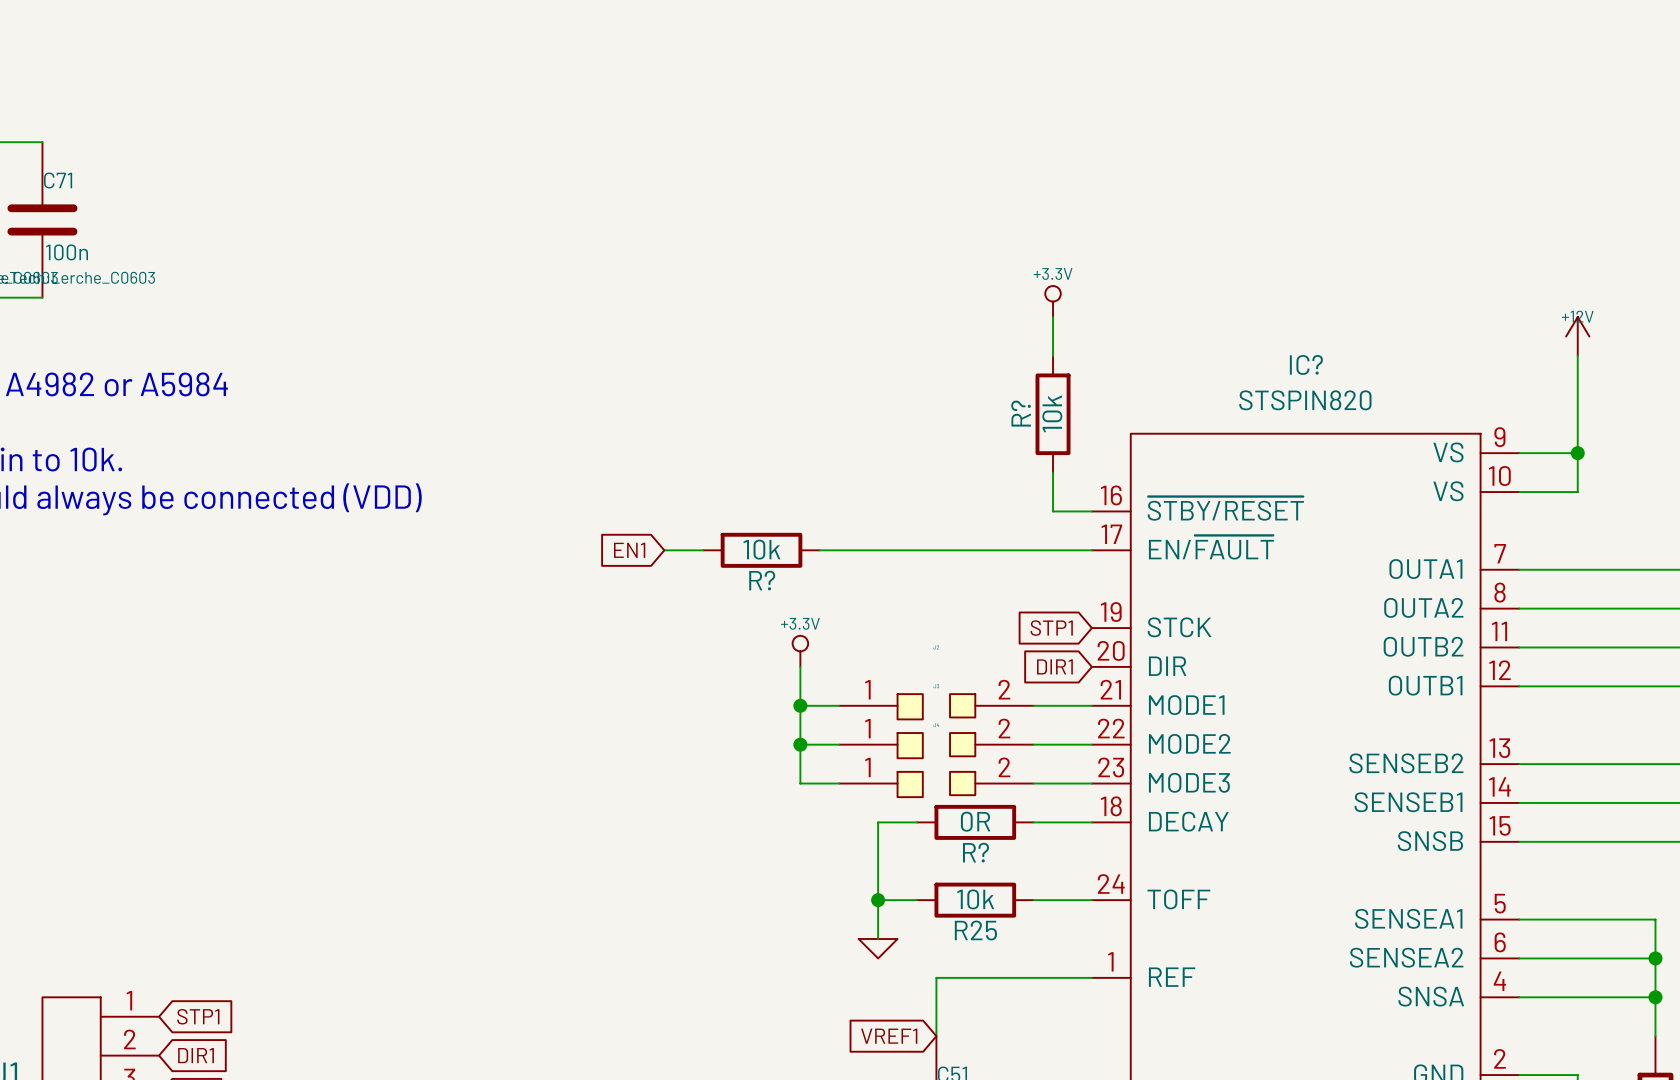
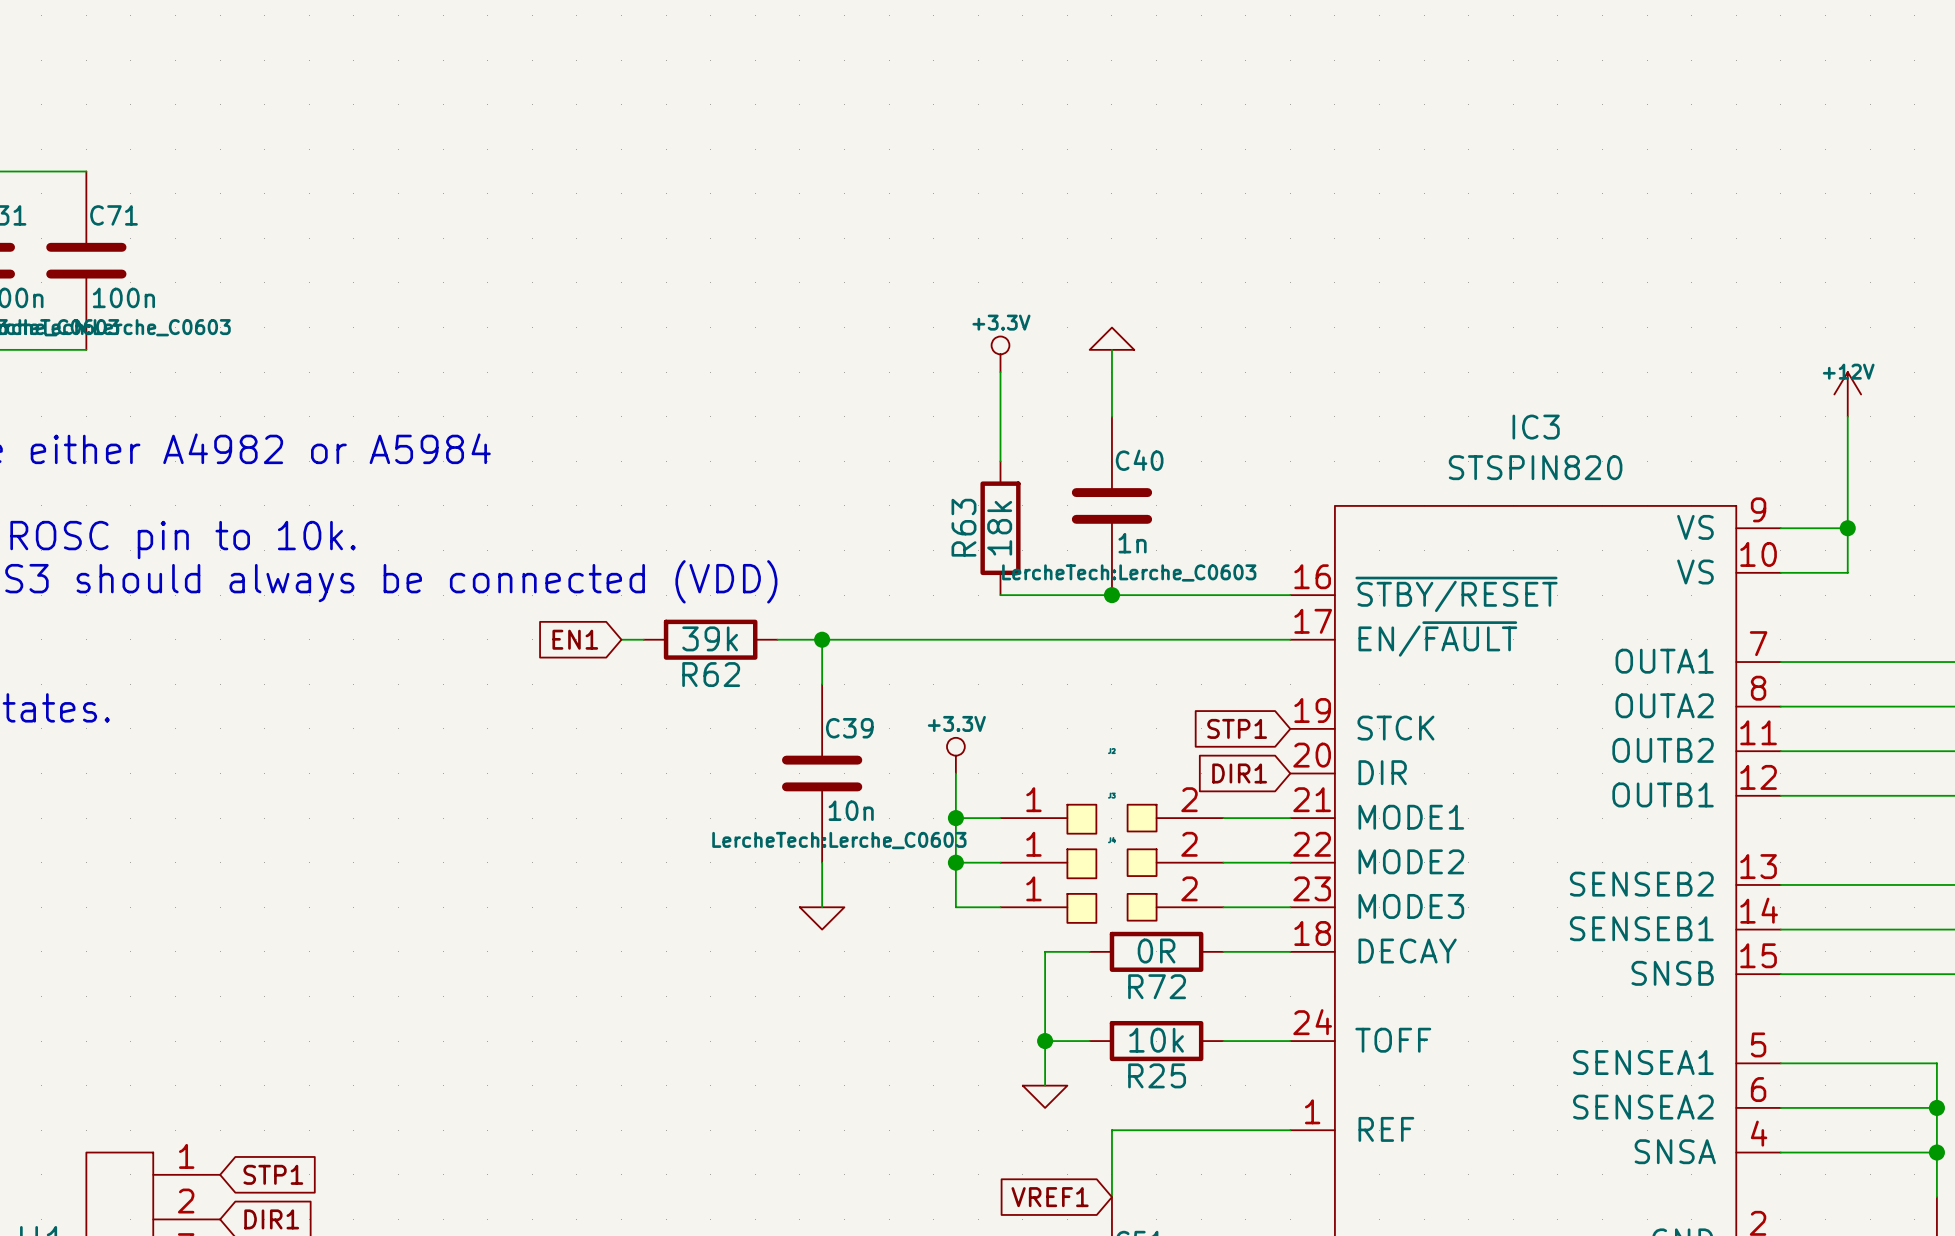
power symbol: none -> (1111, 338)
wire: none -> (1111, 349) (1111, 416)
power symbol position: +3.3V (1053, 301) -> +3.3V (1000, 354)
wire: none -> (1000, 372) (1000, 461)
wire: (1053, 317) (1053, 355) -> none
IC? name: IC? (1306, 364) -> IC3 (1536, 427)
R?: 10k (1053, 414) -> none
C40: none -> 1n (1111, 505)
R63: none -> 18k (1000, 528)
wire: (1053, 472) (1053, 511) -> (1000, 595) (1245, 595)
junction: none -> (1111, 595)
wire: none -> (621, 639) (643, 639)
R62: none -> 39k (710, 639)
global label position: EN1 (629, 550) -> EN1 (575, 639)
wire: none -> (777, 639) (799, 639)
wire: none -> (822, 639) (822, 684)
junction: none -> (822, 639)
wire: none -> (844, 639) (978, 639)
R?: 10k (761, 550) -> none
C39: none -> 10n (822, 773)
wire: none -> (822, 862) (822, 907)
power symbol: none -> (822, 918)
R? name: R? (976, 852) -> R72 (1157, 986)

